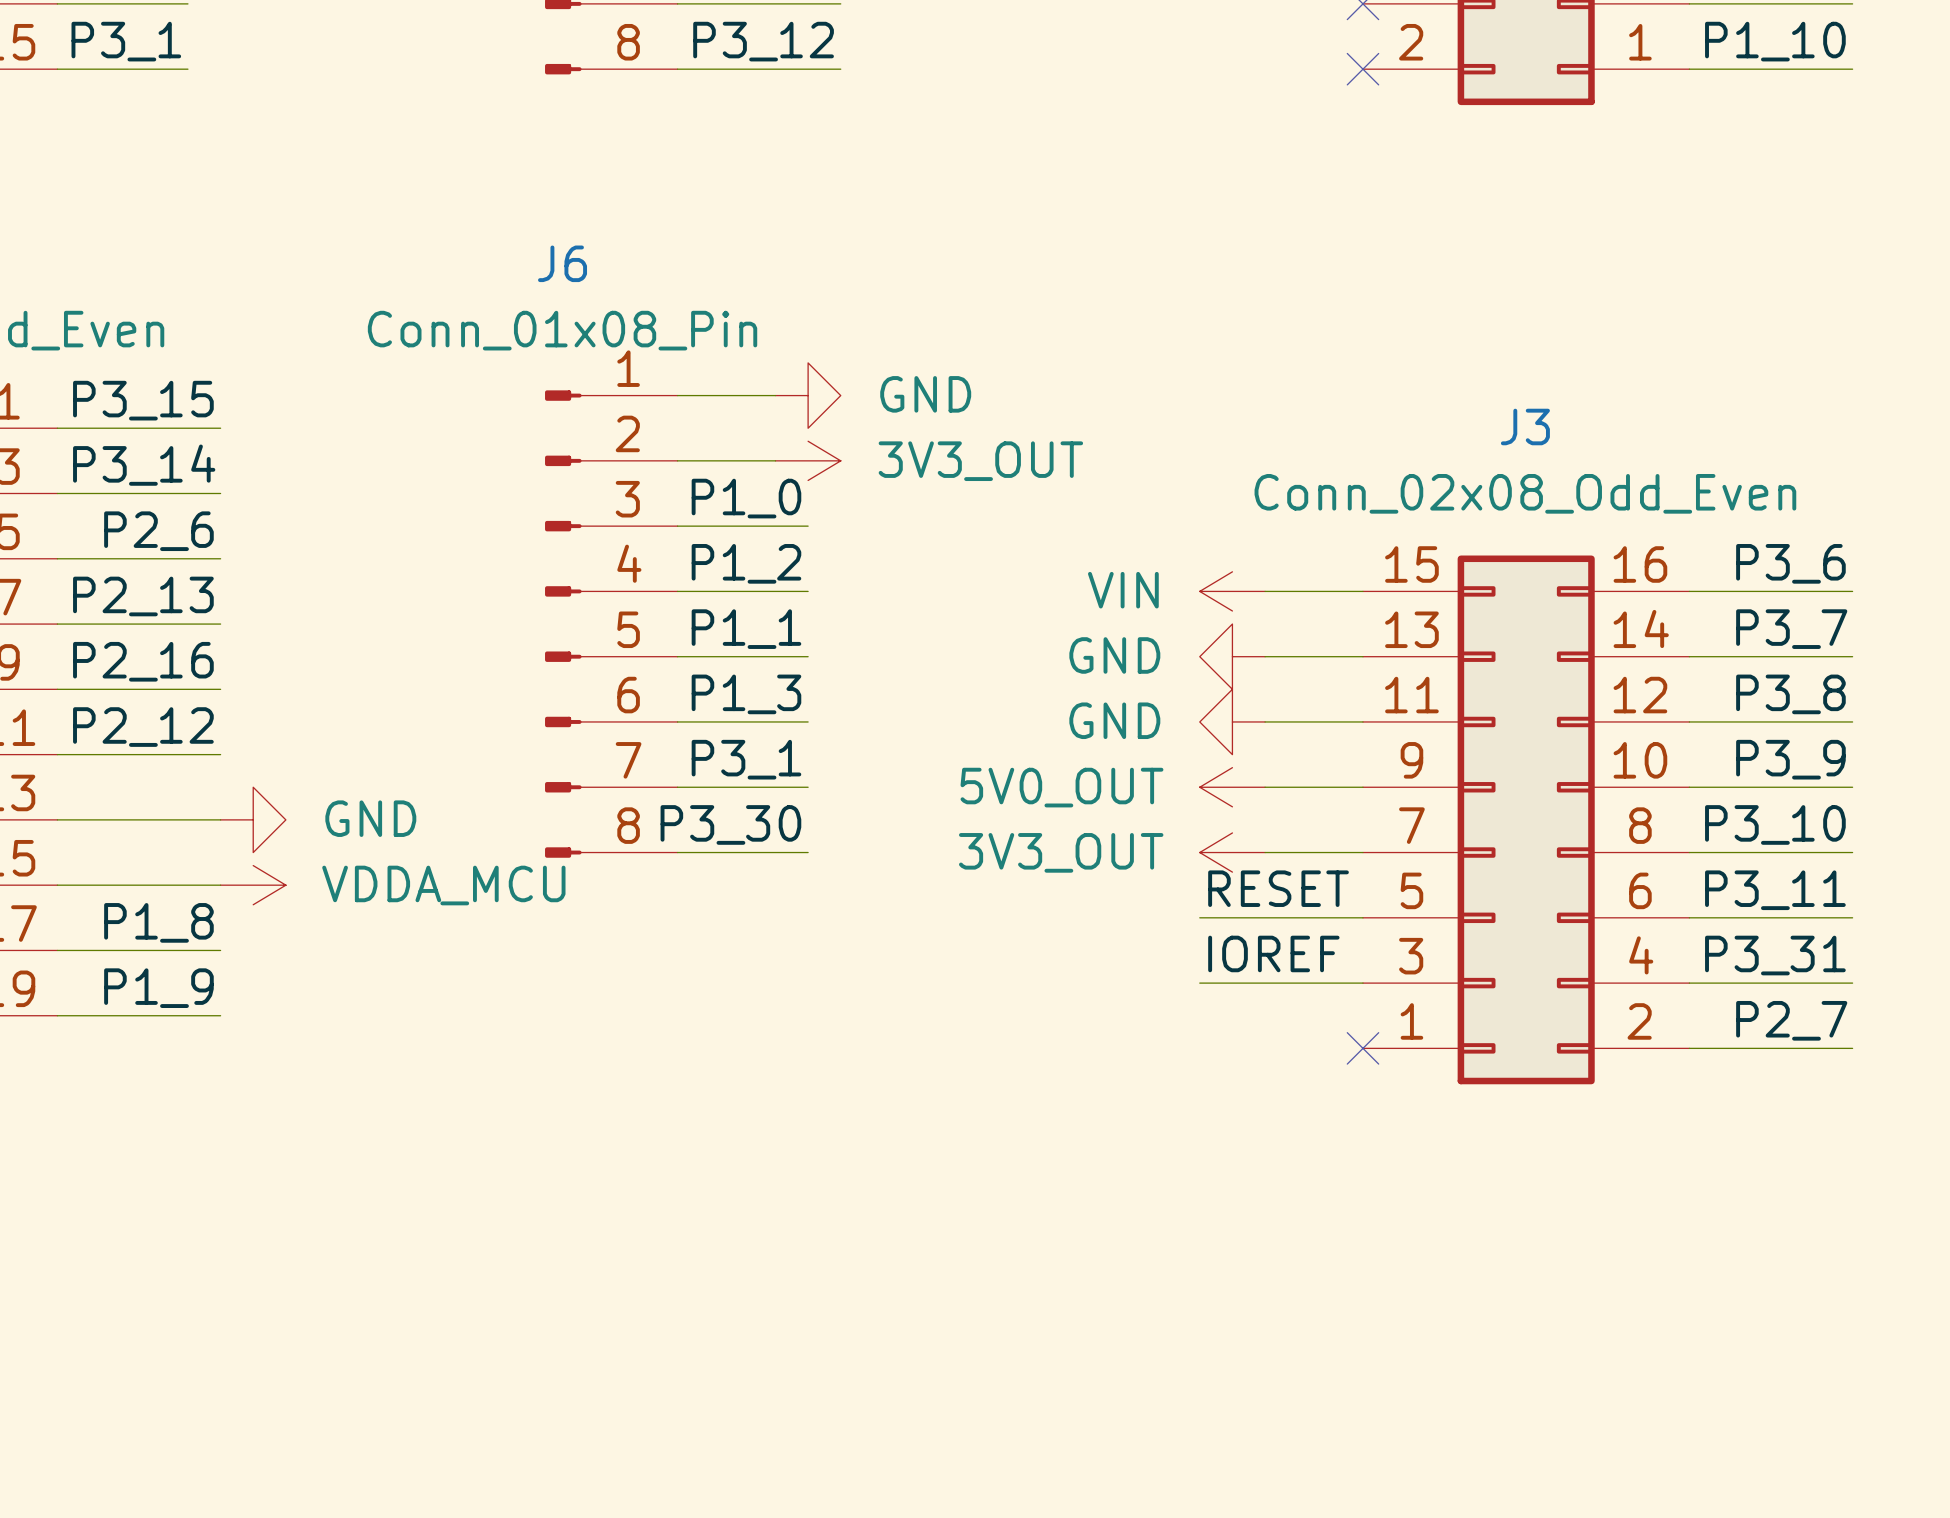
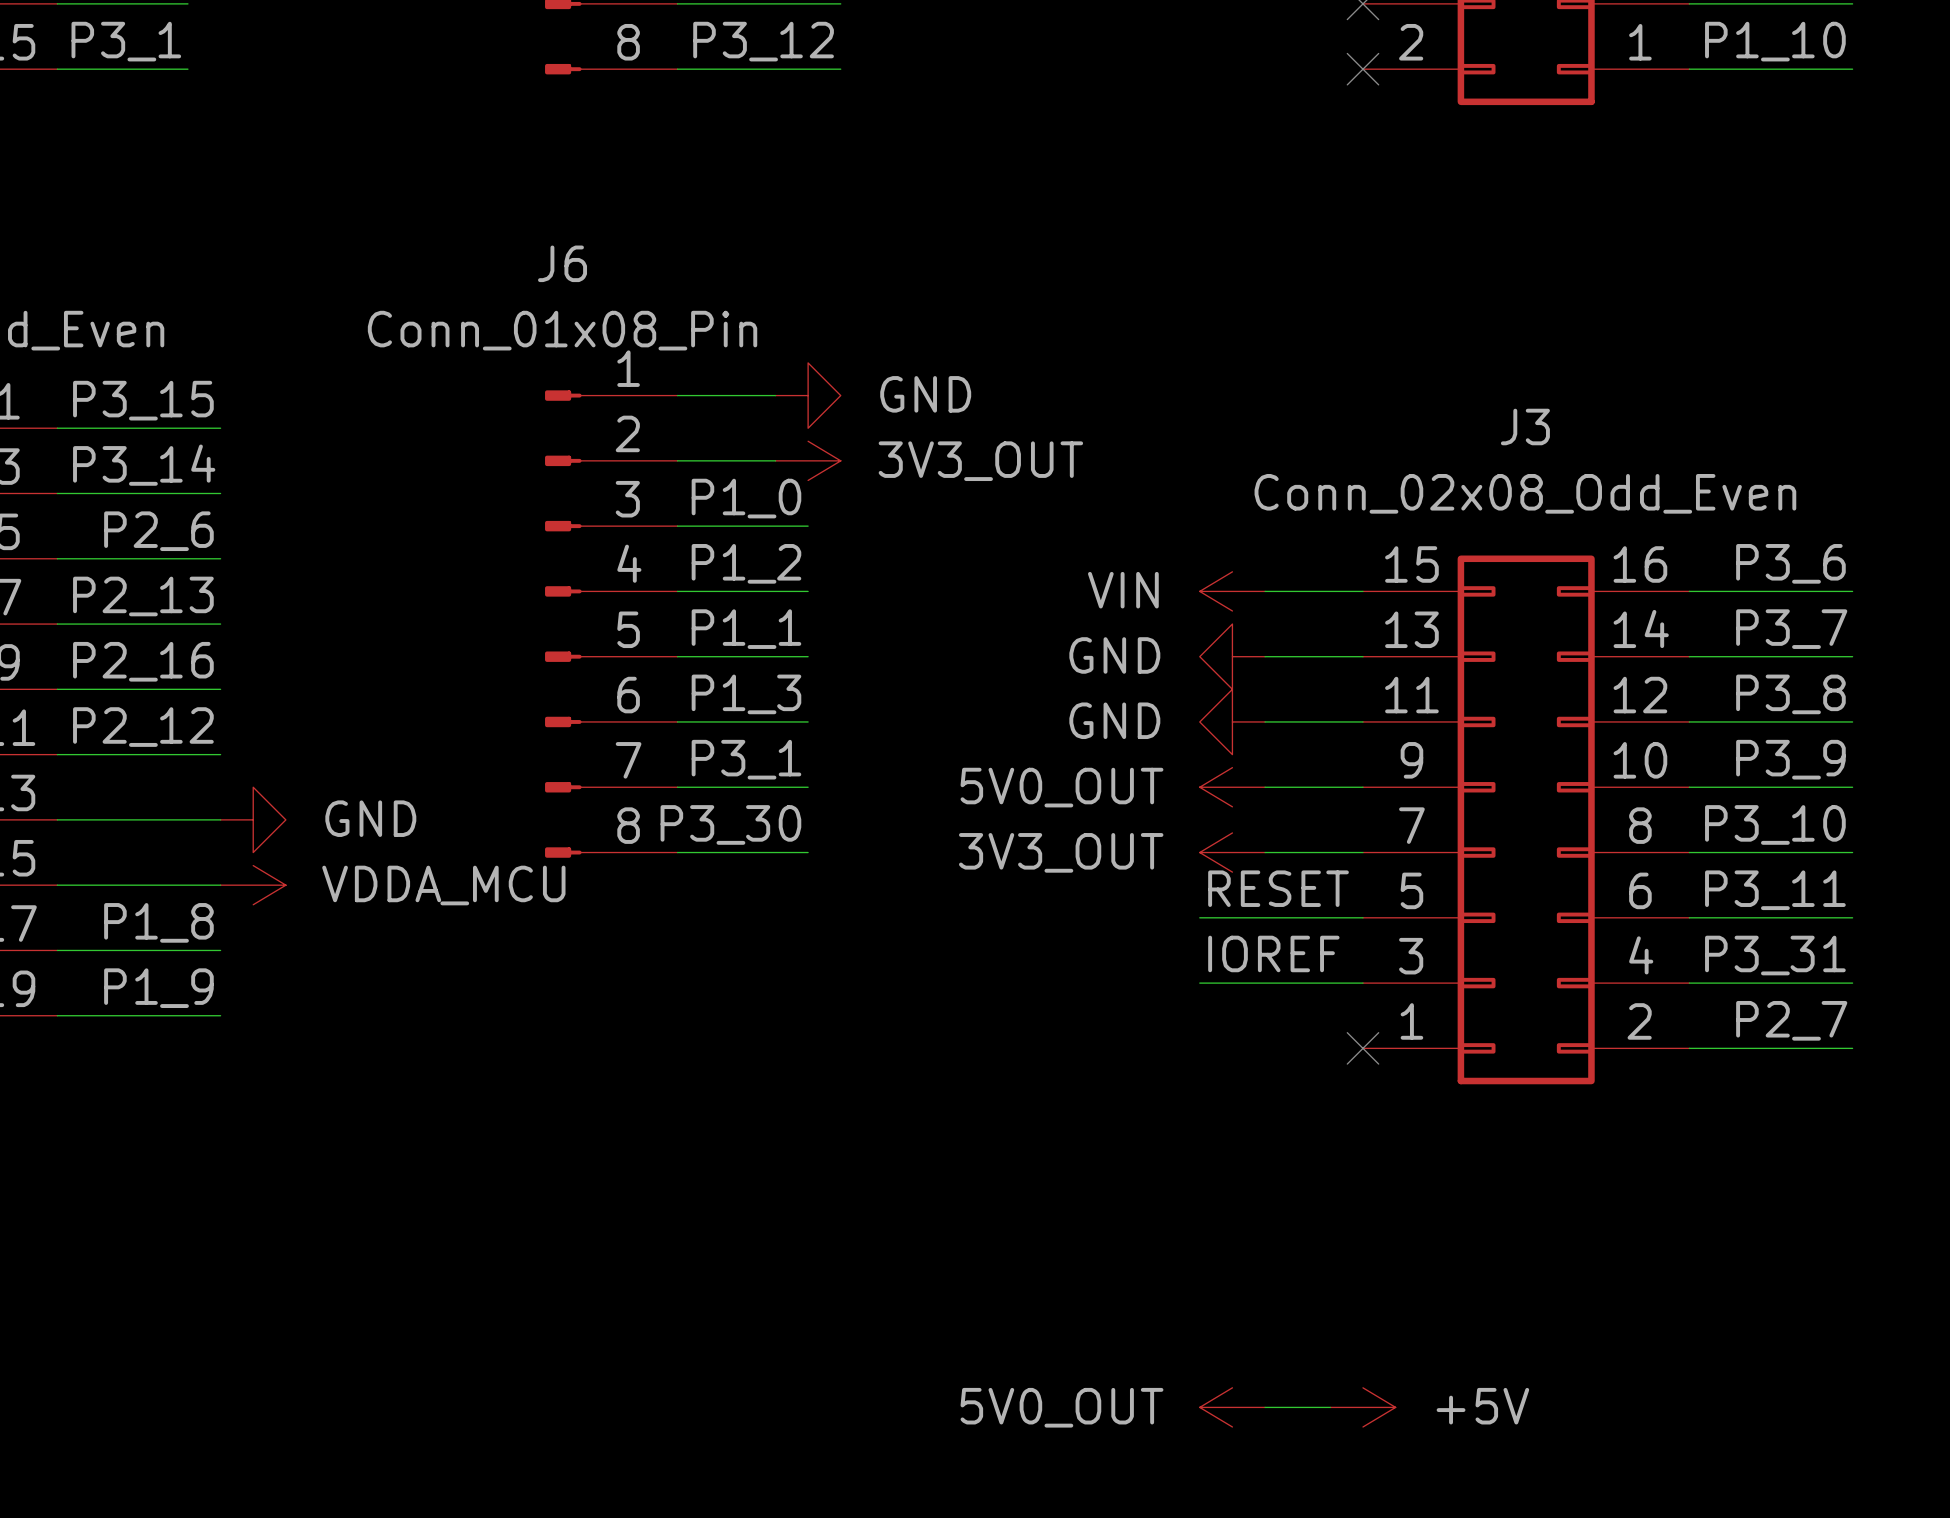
power symbol: none -> 5V0_OUT (1232, 1407)
wire: none -> (1265, 1407) (1330, 1407)
power symbol: none -> +5V (1362, 1407)

